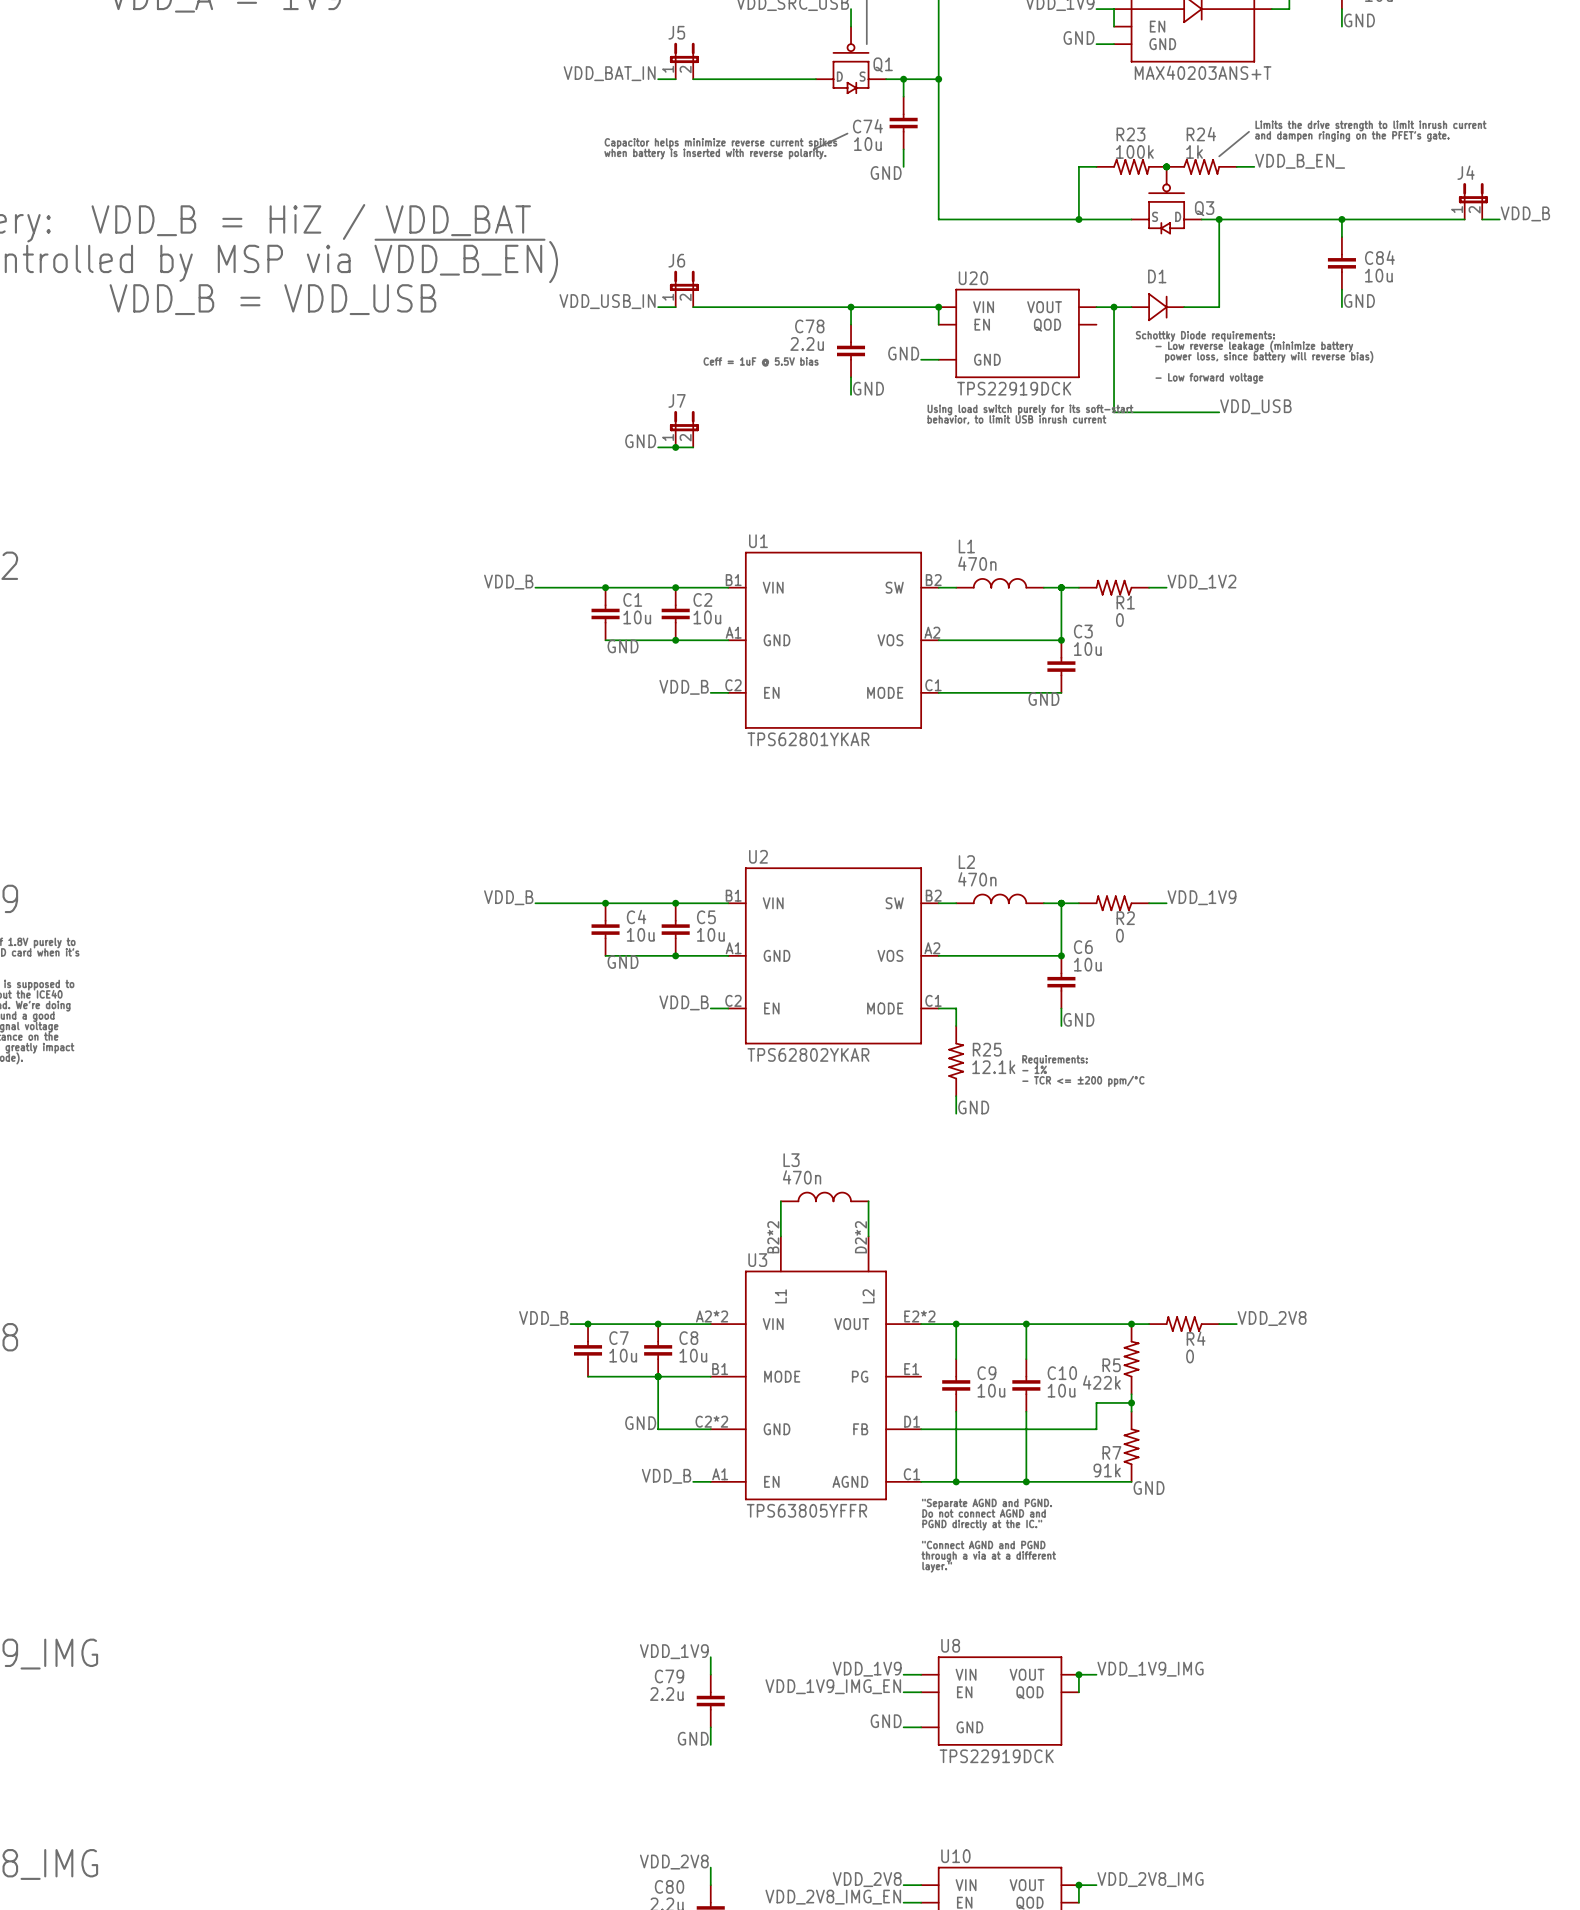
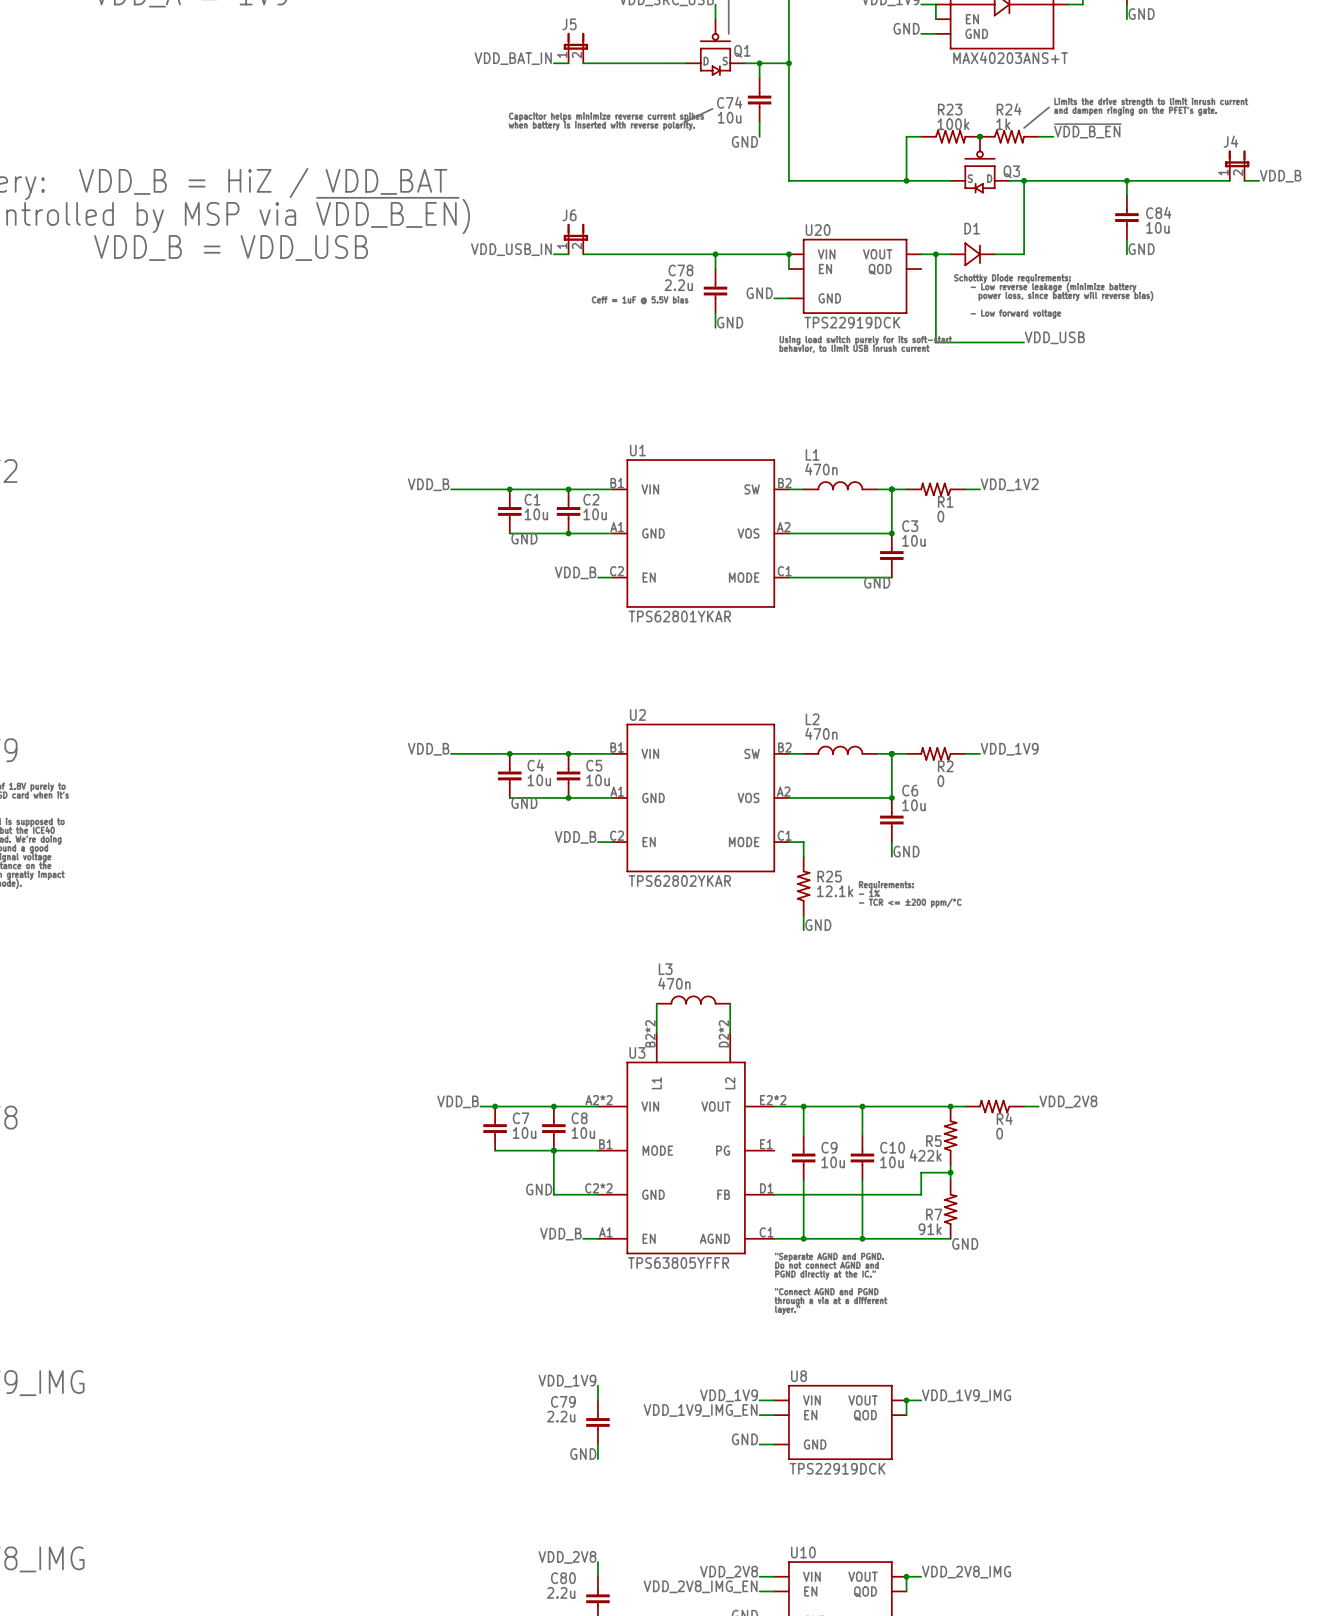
label: VDD_B_EN_ (1300, 161) -> ~{VDD_B_EN} (1087, 130)
J7: (684, 429) -> none
label: GND (640, 441) -> none
wire: (658, 447) (693, 447) -> none
junction: (675, 447) -> none

